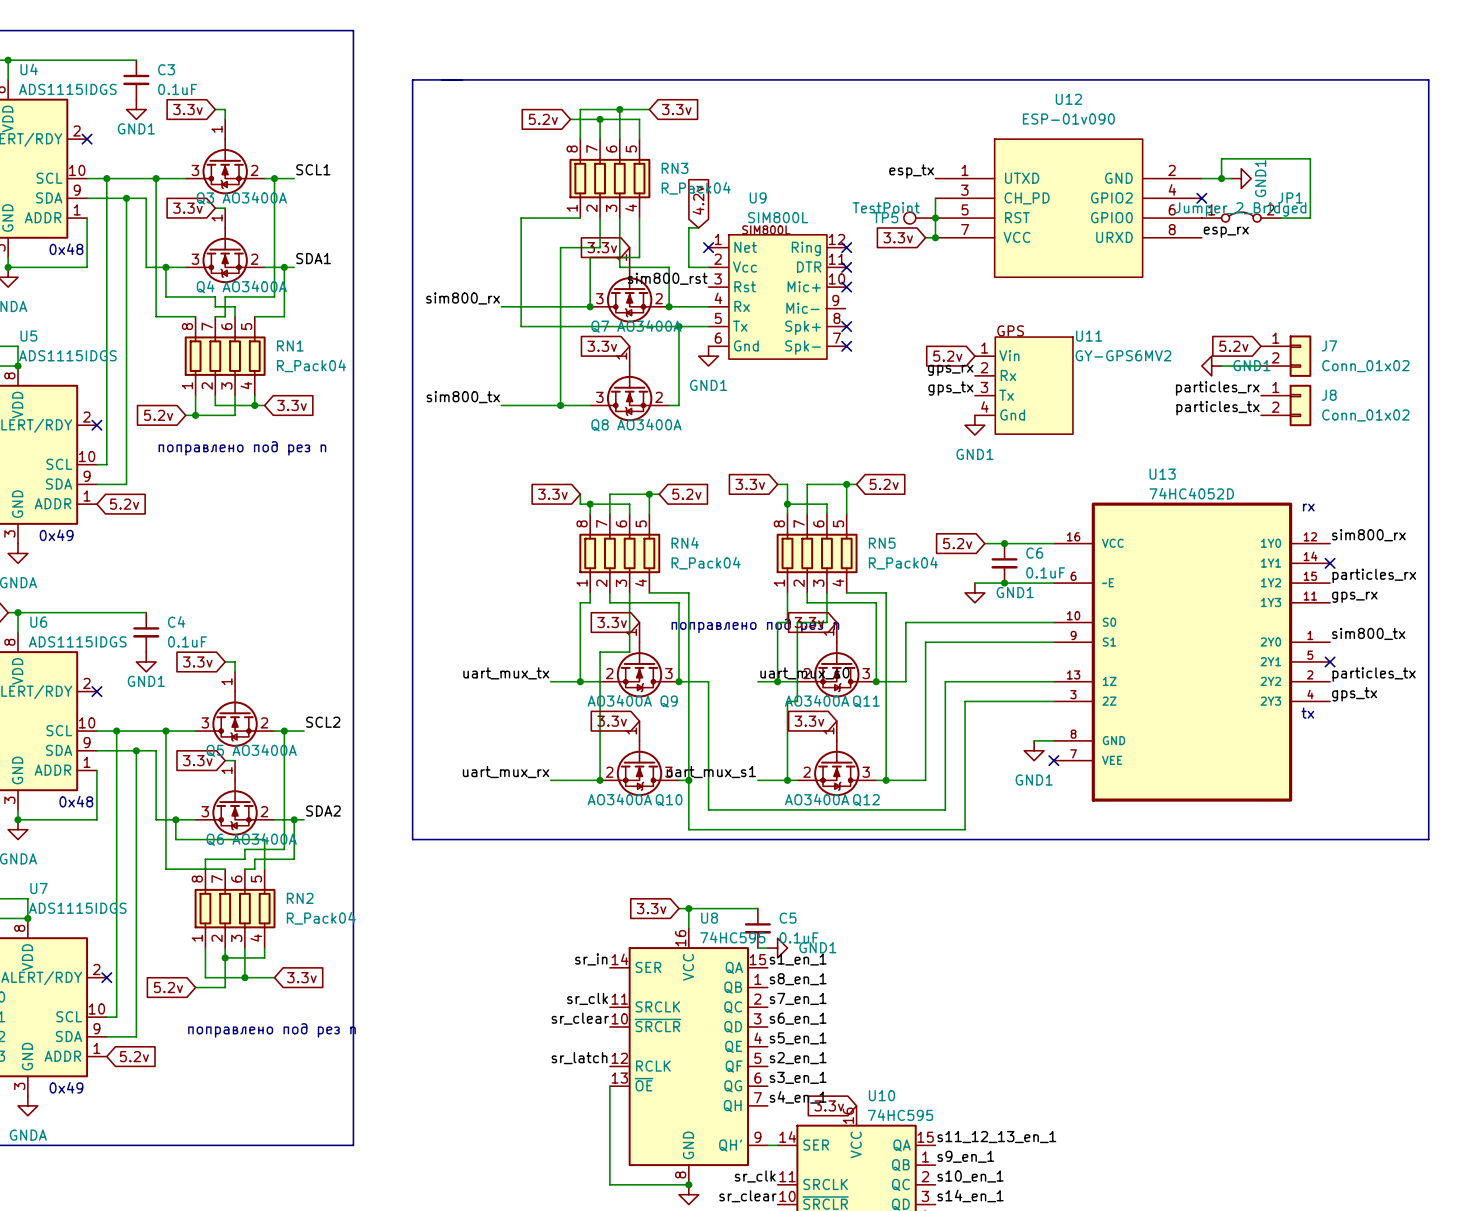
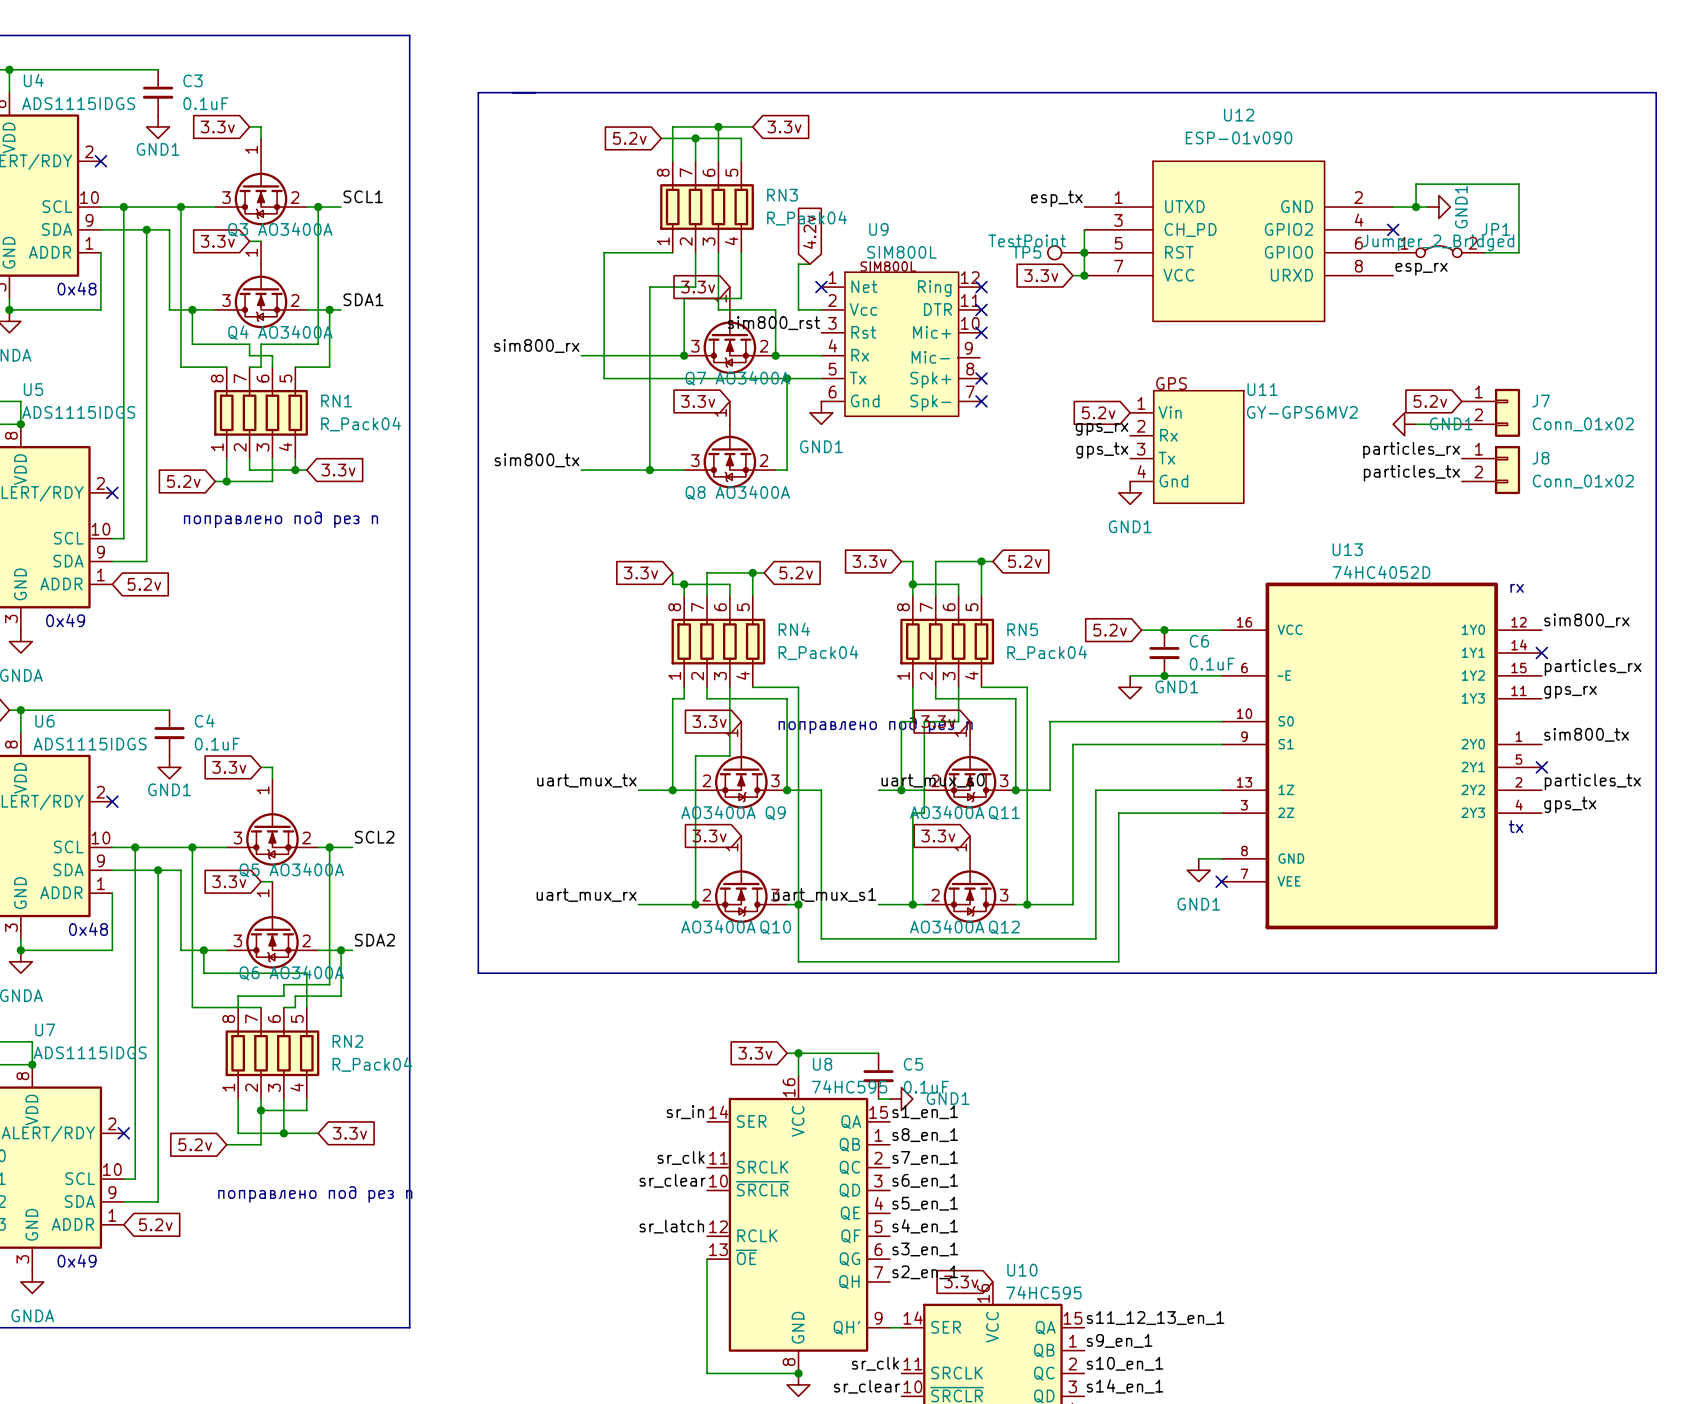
label: s2_en_1 (798, 1058) -> s4_en_1 (925, 1226)
label: s4_en_1 (798, 1097) -> s2_en_1 (925, 1272)

